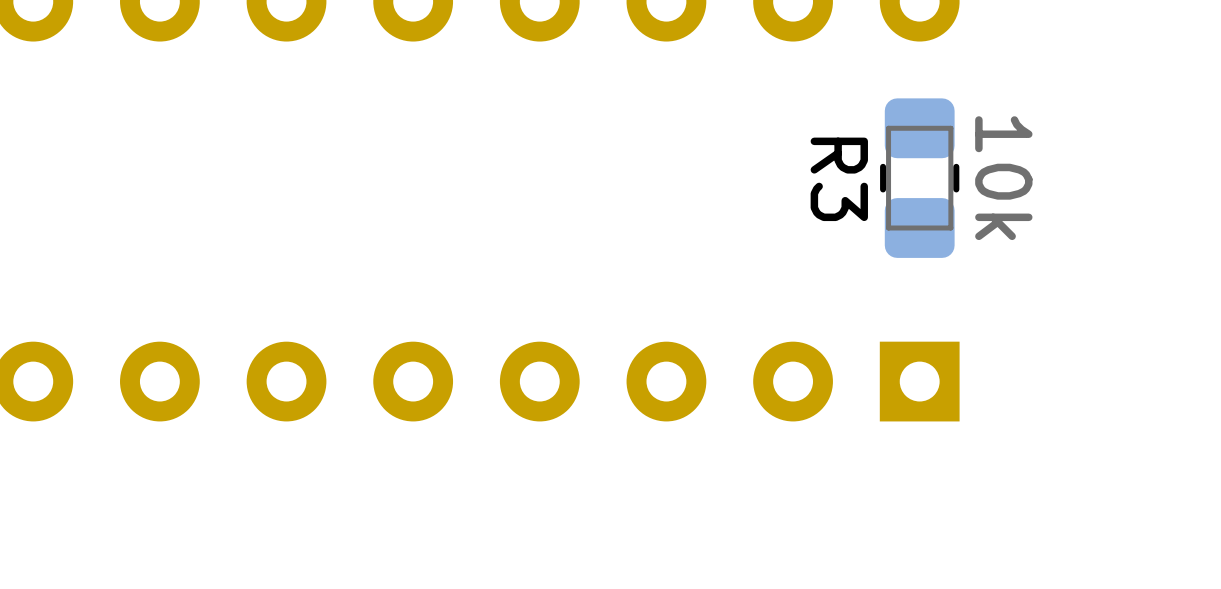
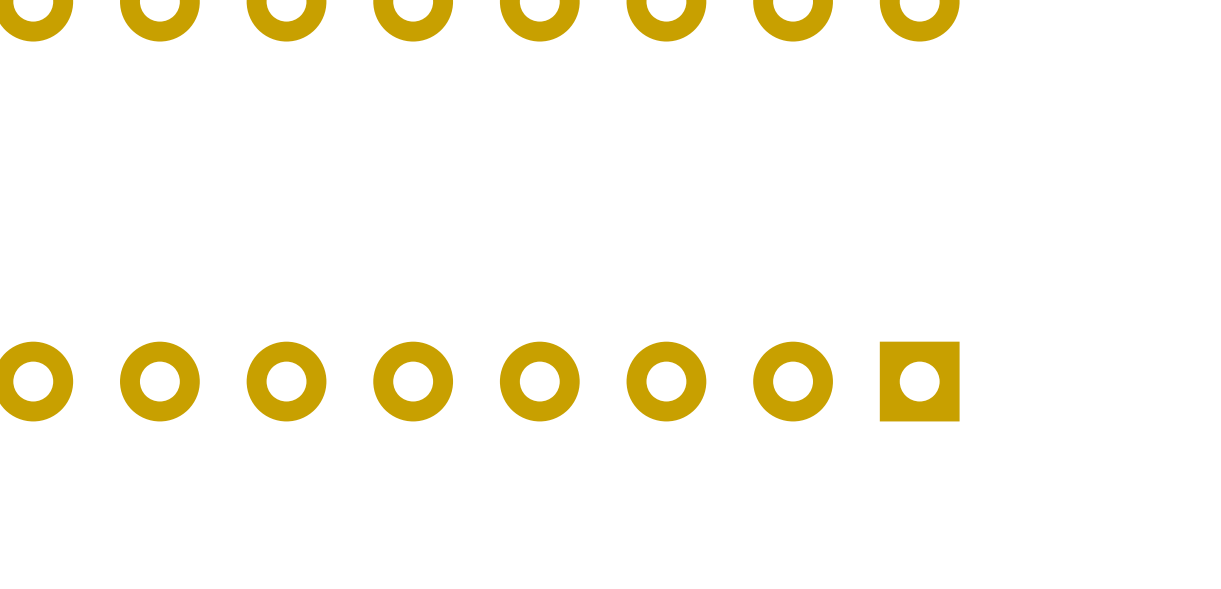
R3: 10k (919, 178) -> none

